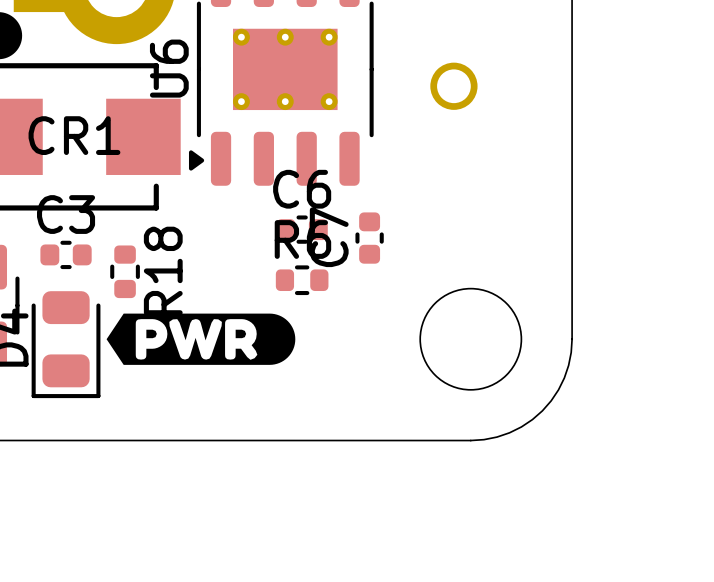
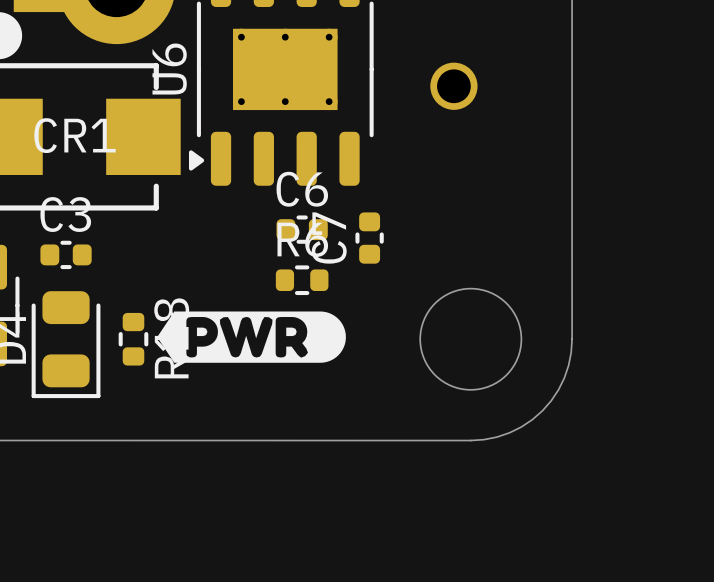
R18 position: (125, 271) -> (133, 339)
drawing position: (200, 339) -> (251, 337)

